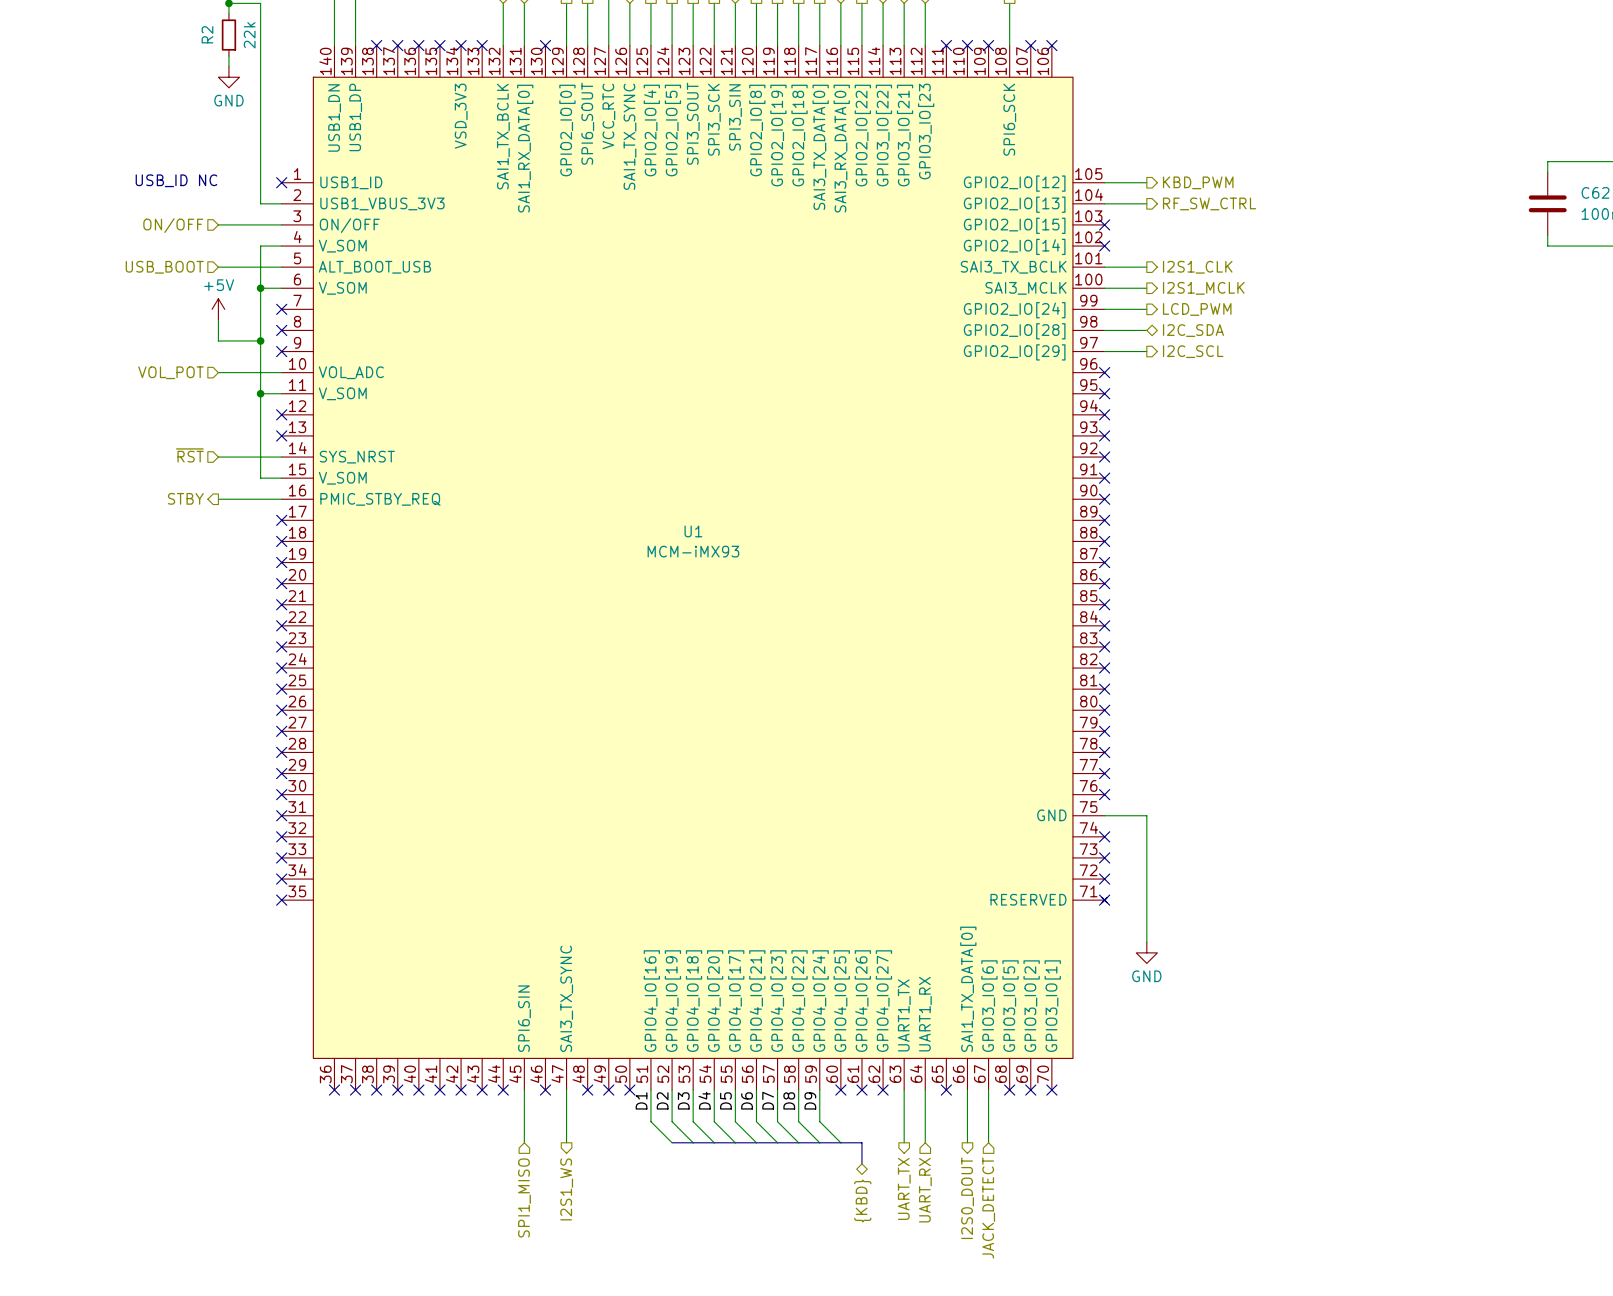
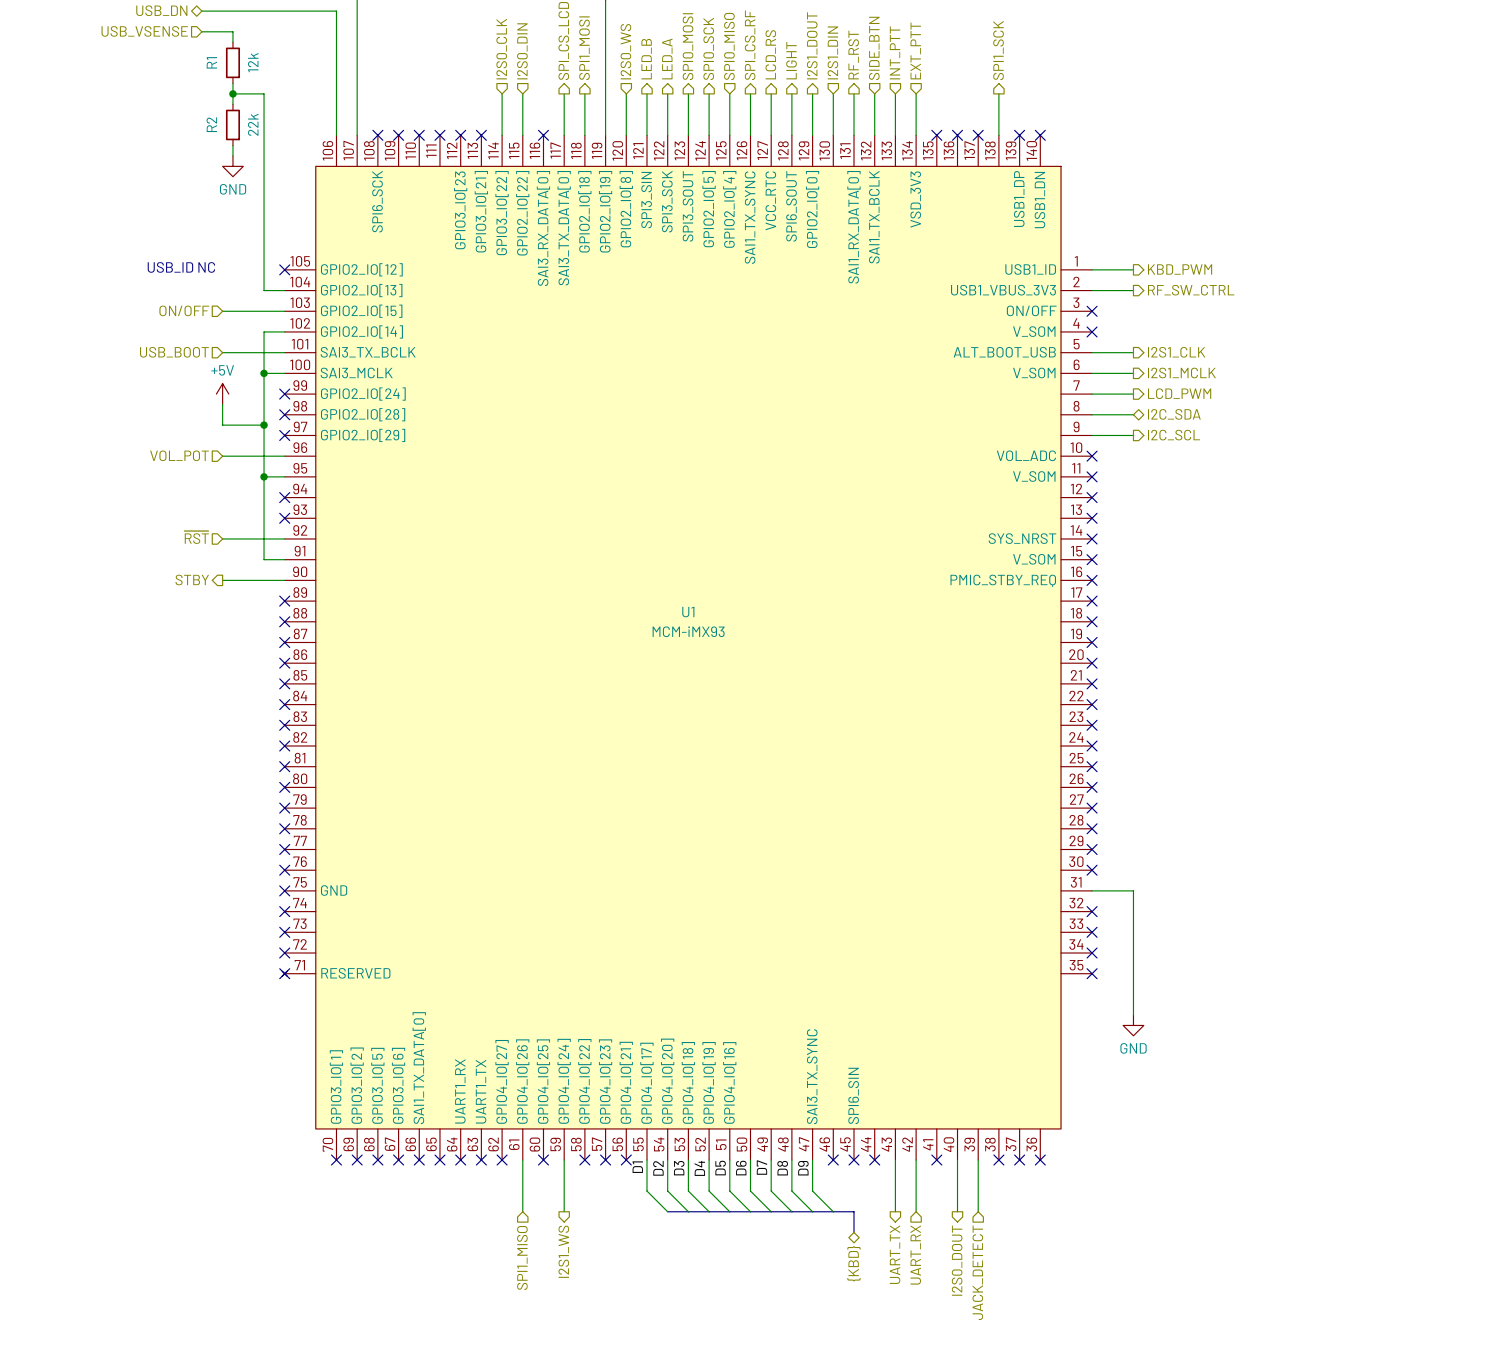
U1 flip: as is (710, 567) -> left-right (671, 647)

